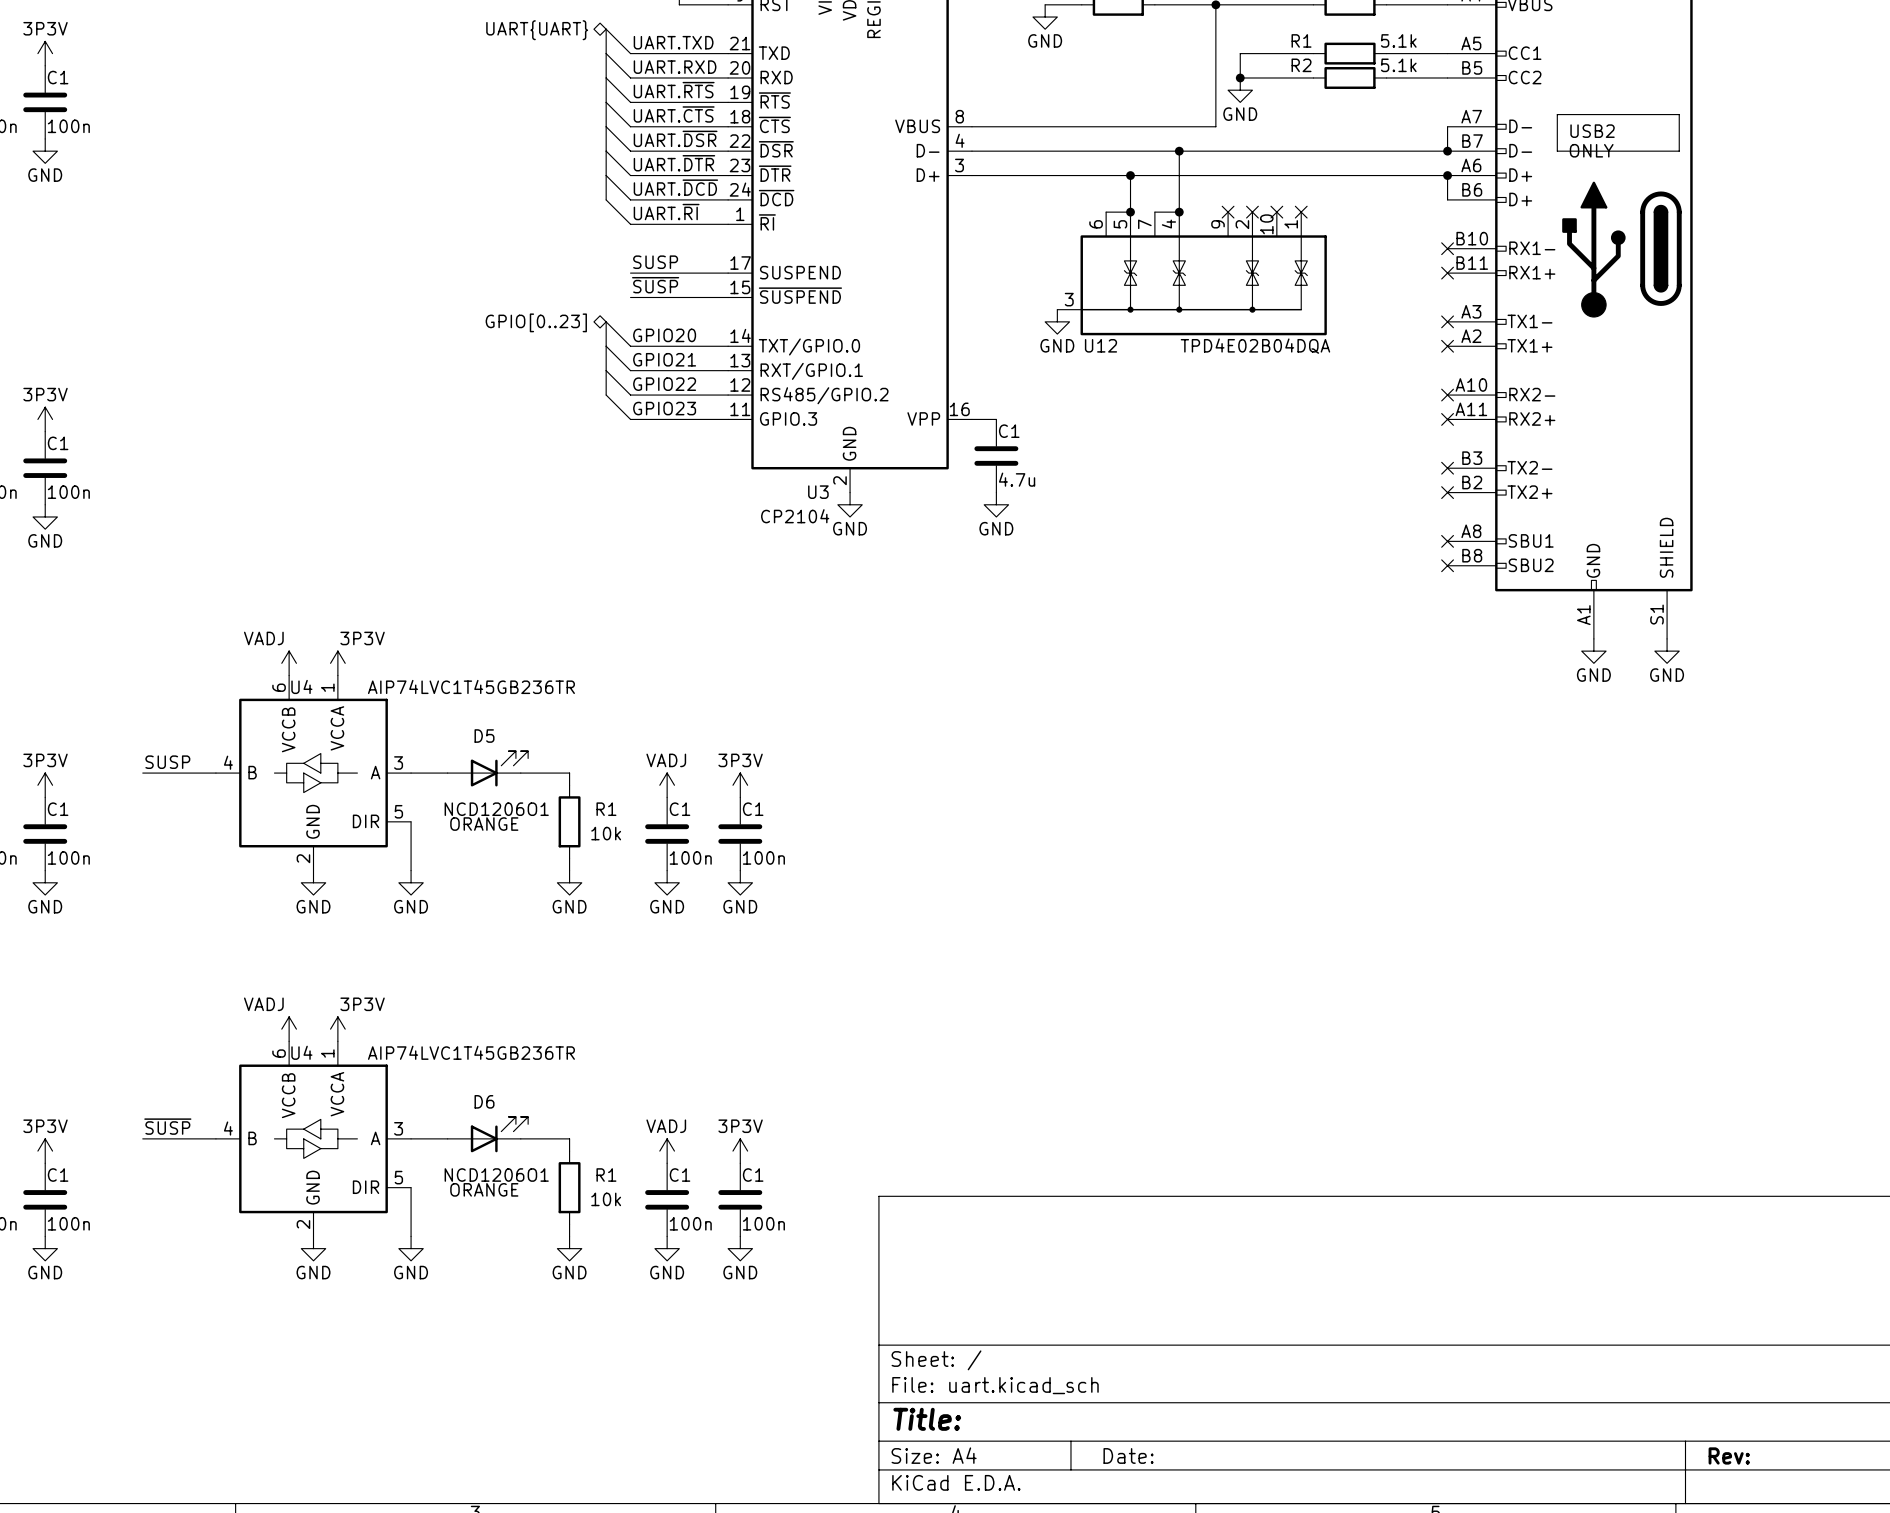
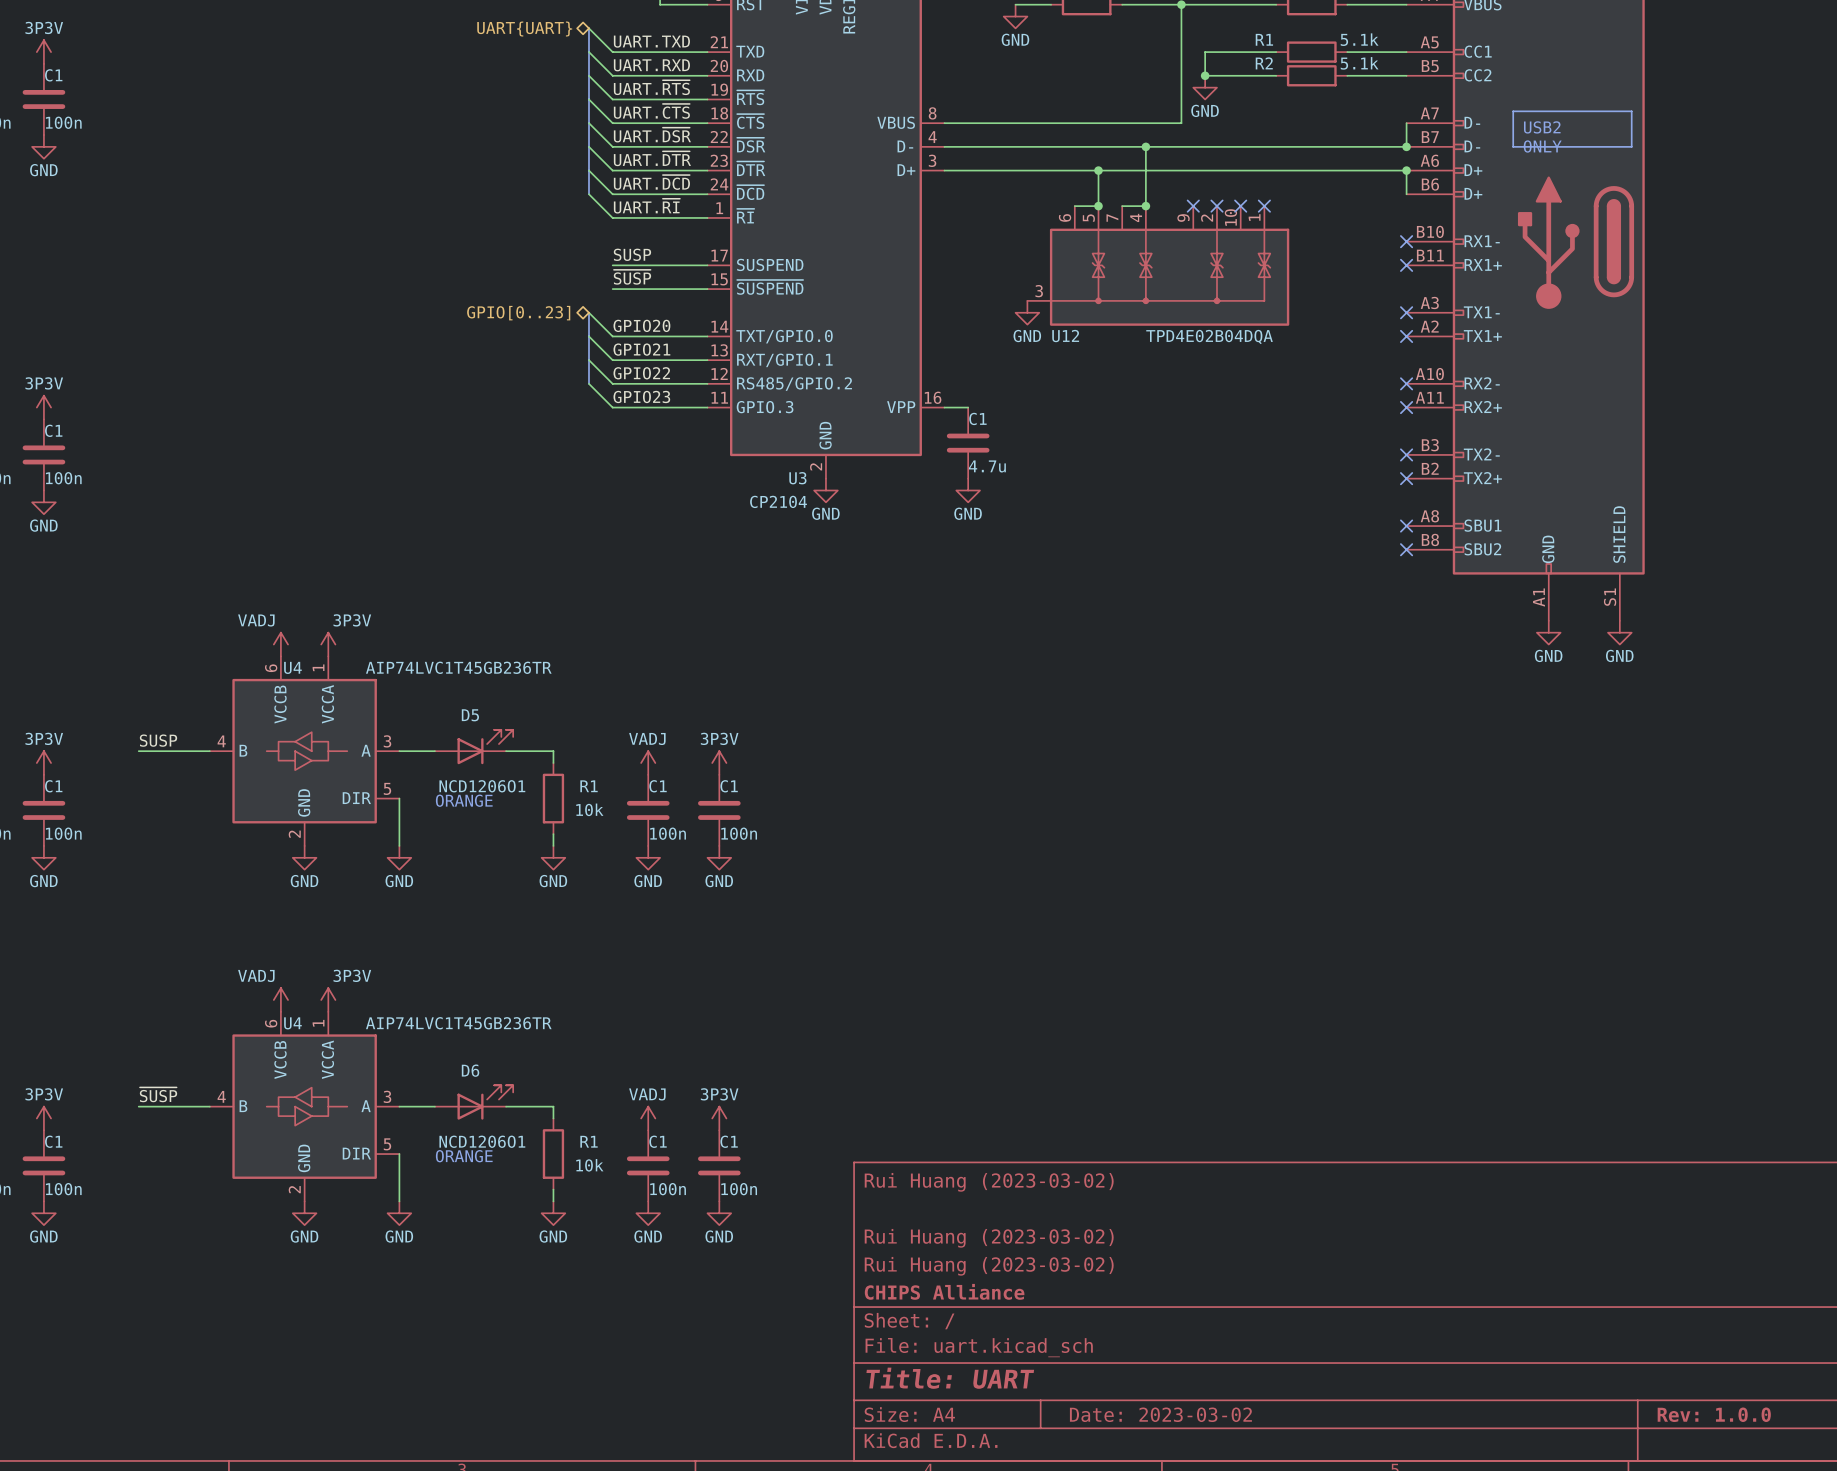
title block: none -> Rui Huang (2023-03-02) (989, 1182)
title block: none -> Rui Huang (2023-03-02) (989, 1238)
title block: none -> Rui Huang (2023-03-02) (989, 1266)
title block: none -> CHIPS Alliance (944, 1291)
title block: Title: (927, 1419) -> Title: UART (950, 1378)
title block: Date: (1128, 1455) -> Date: 2023-03-02 (1160, 1414)
title block: Rev: (1729, 1455) -> Rev: 1.0.0 (1714, 1414)

